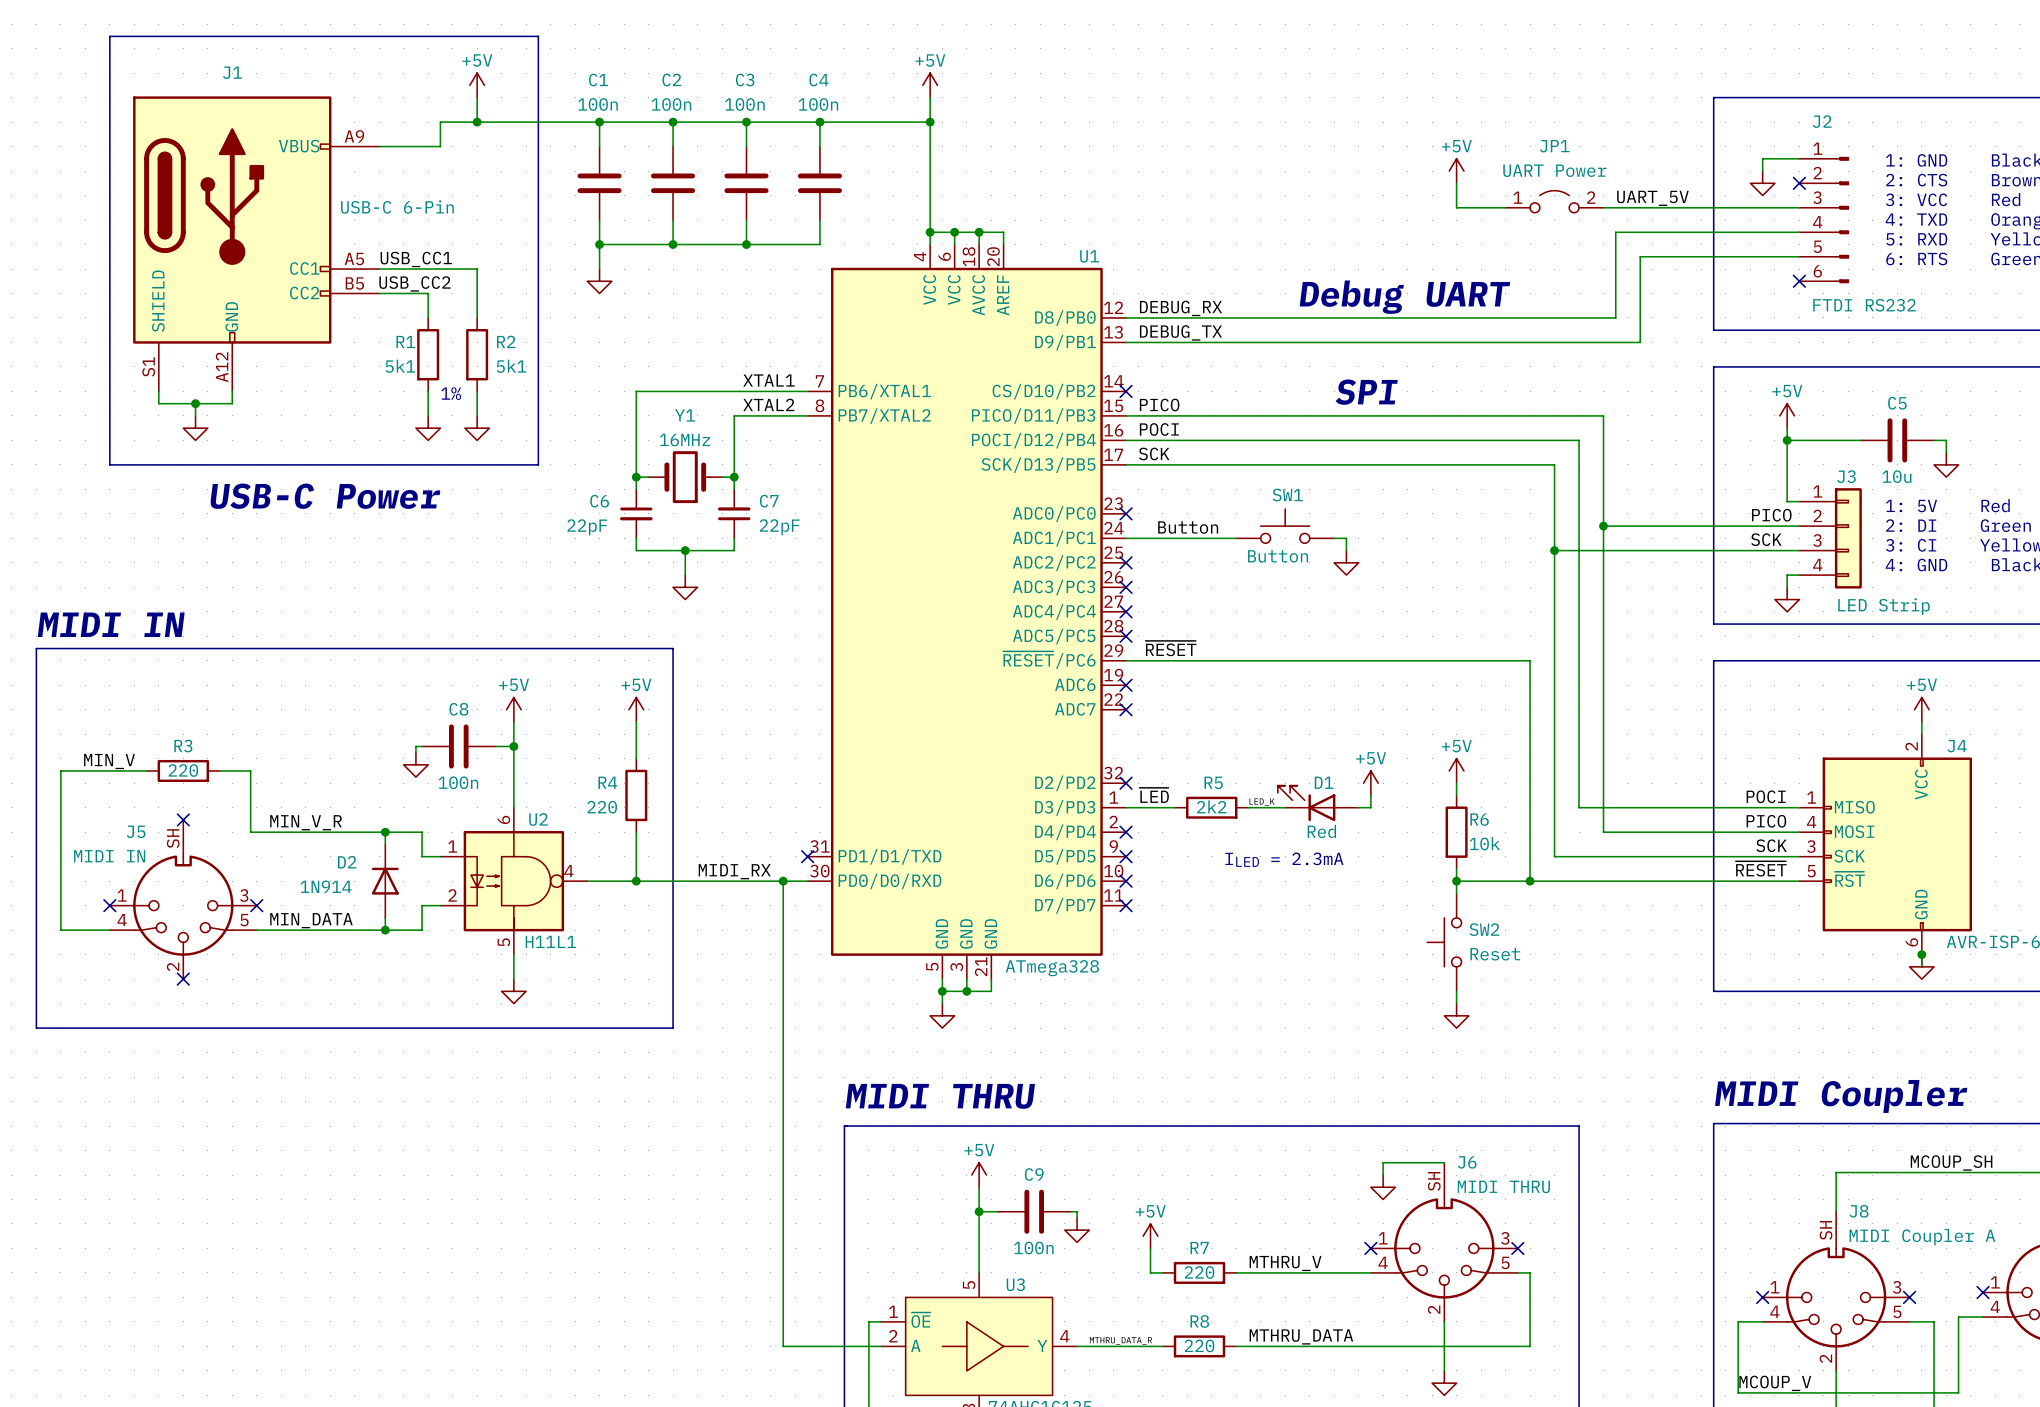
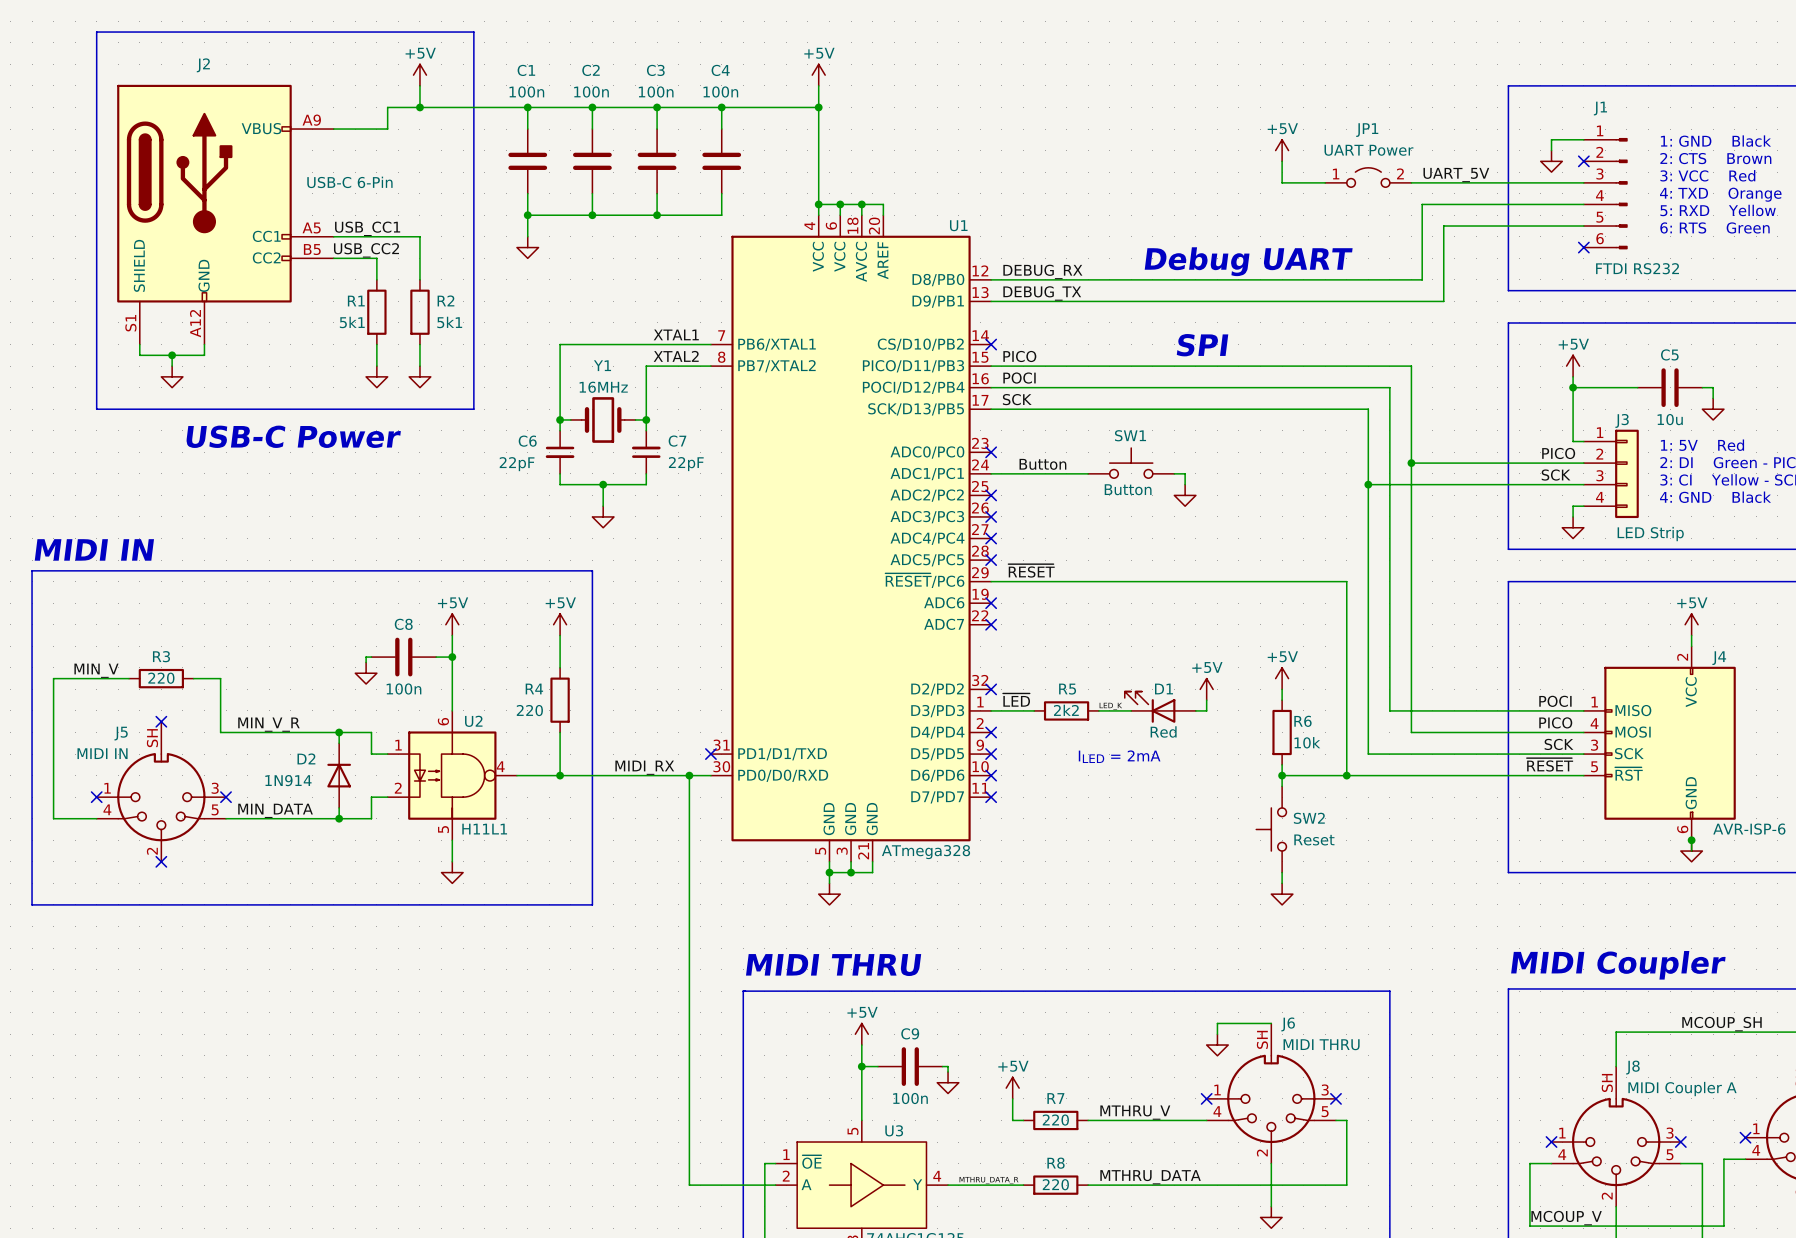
J1 name: J1 (232, 72) -> J2 (203, 65)
J2 name: J2 (1822, 121) -> J1 (1600, 108)
text: 1% (451, 393) -> none
text: ILED = 2.3mA (1284, 859) -> ILED = 2mA (1119, 756)

